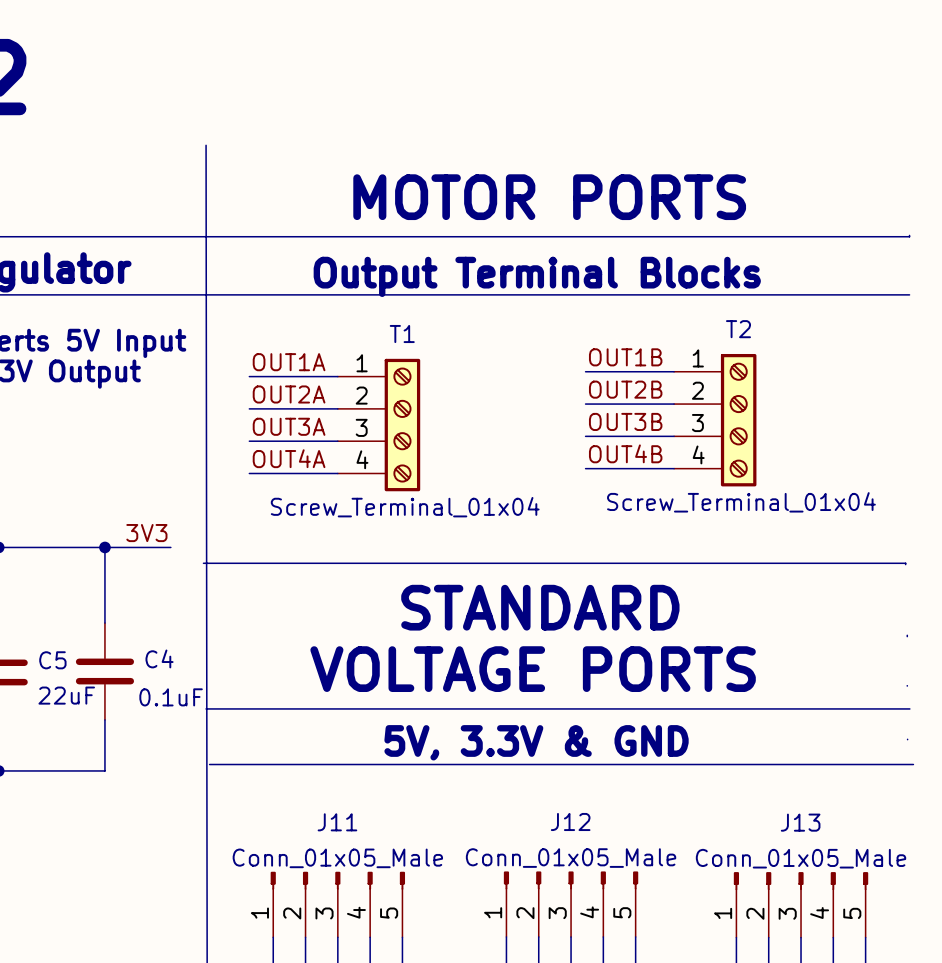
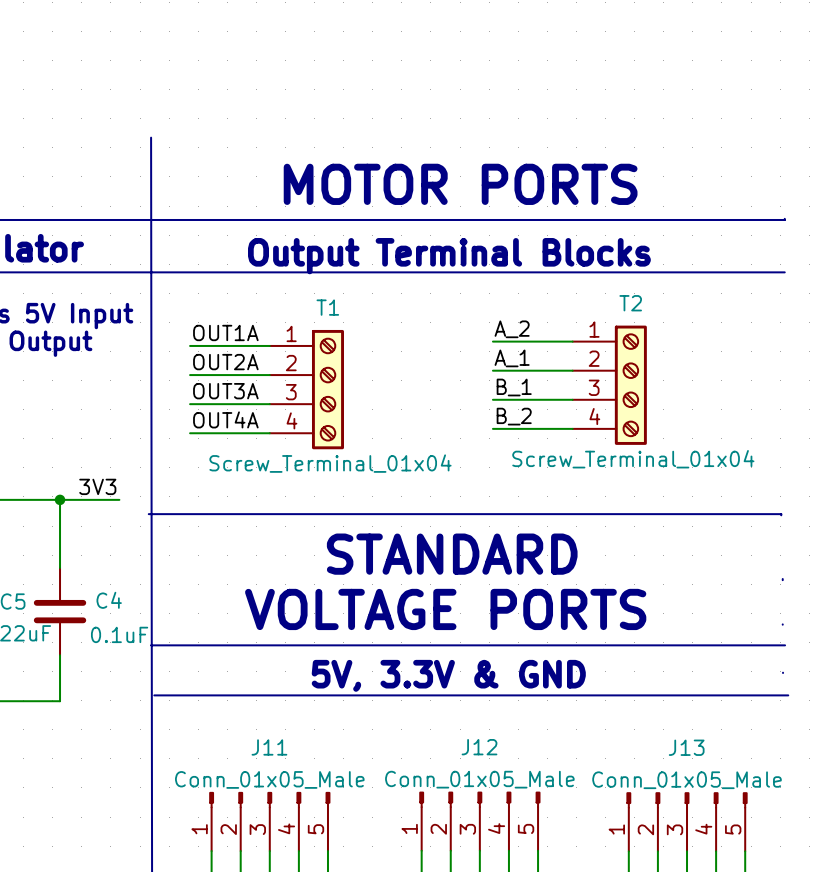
label: OUT1B (625, 357) -> A_2 (512, 329)
label: OUT2B (625, 389) -> A_1 (512, 358)
label: OUT3B (625, 421) -> B_1 (514, 387)
label: OUT4B (625, 453) -> B_2 (514, 416)

